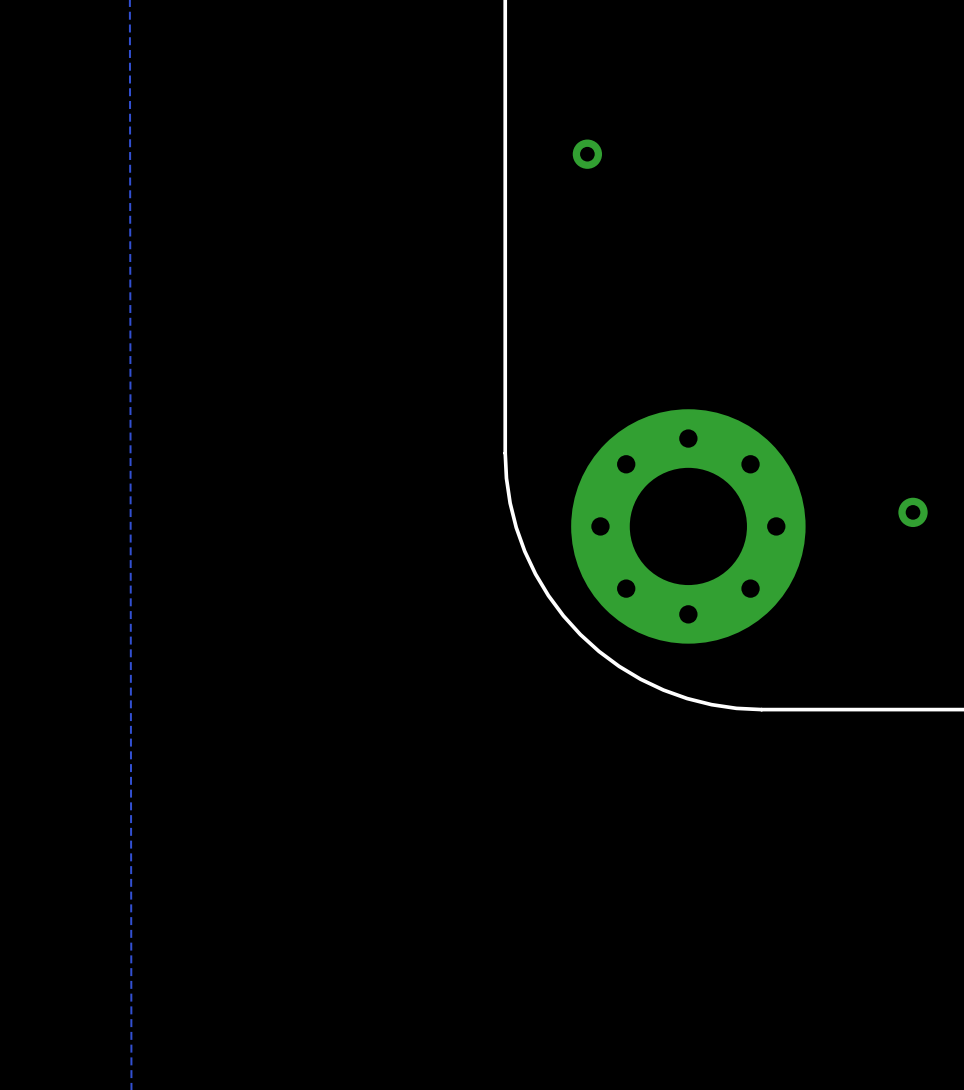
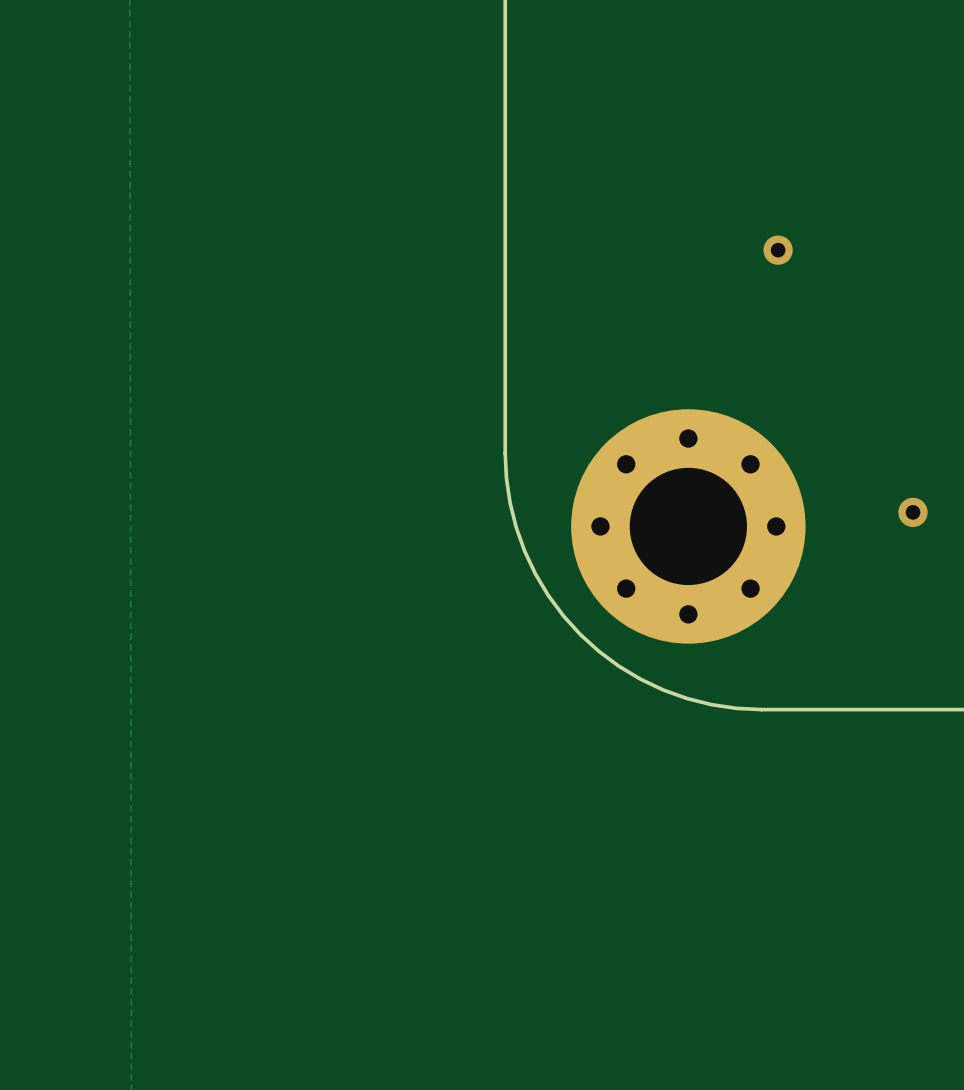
via: (587, 154) -> none
via: none -> (778, 250)

